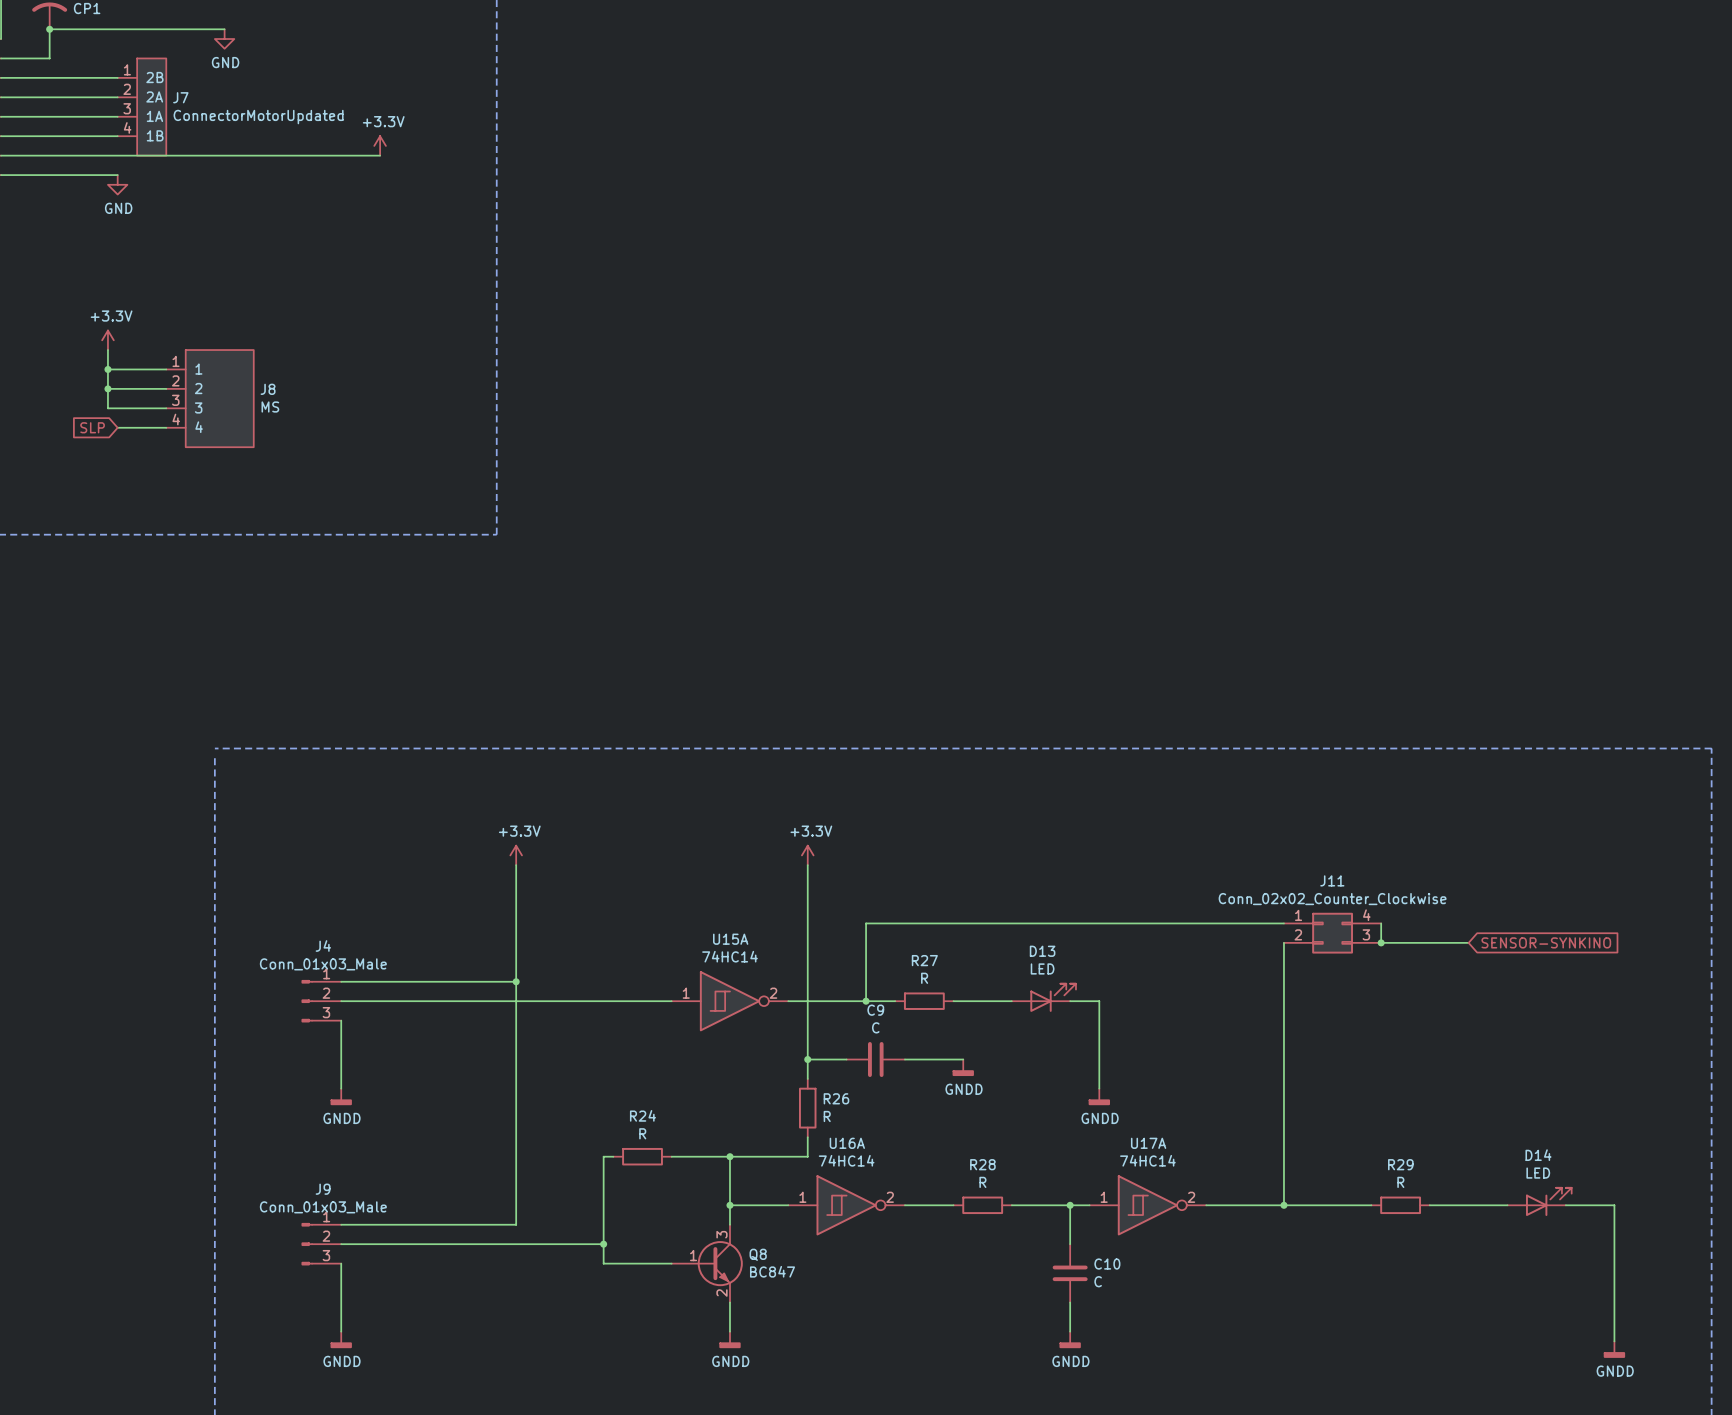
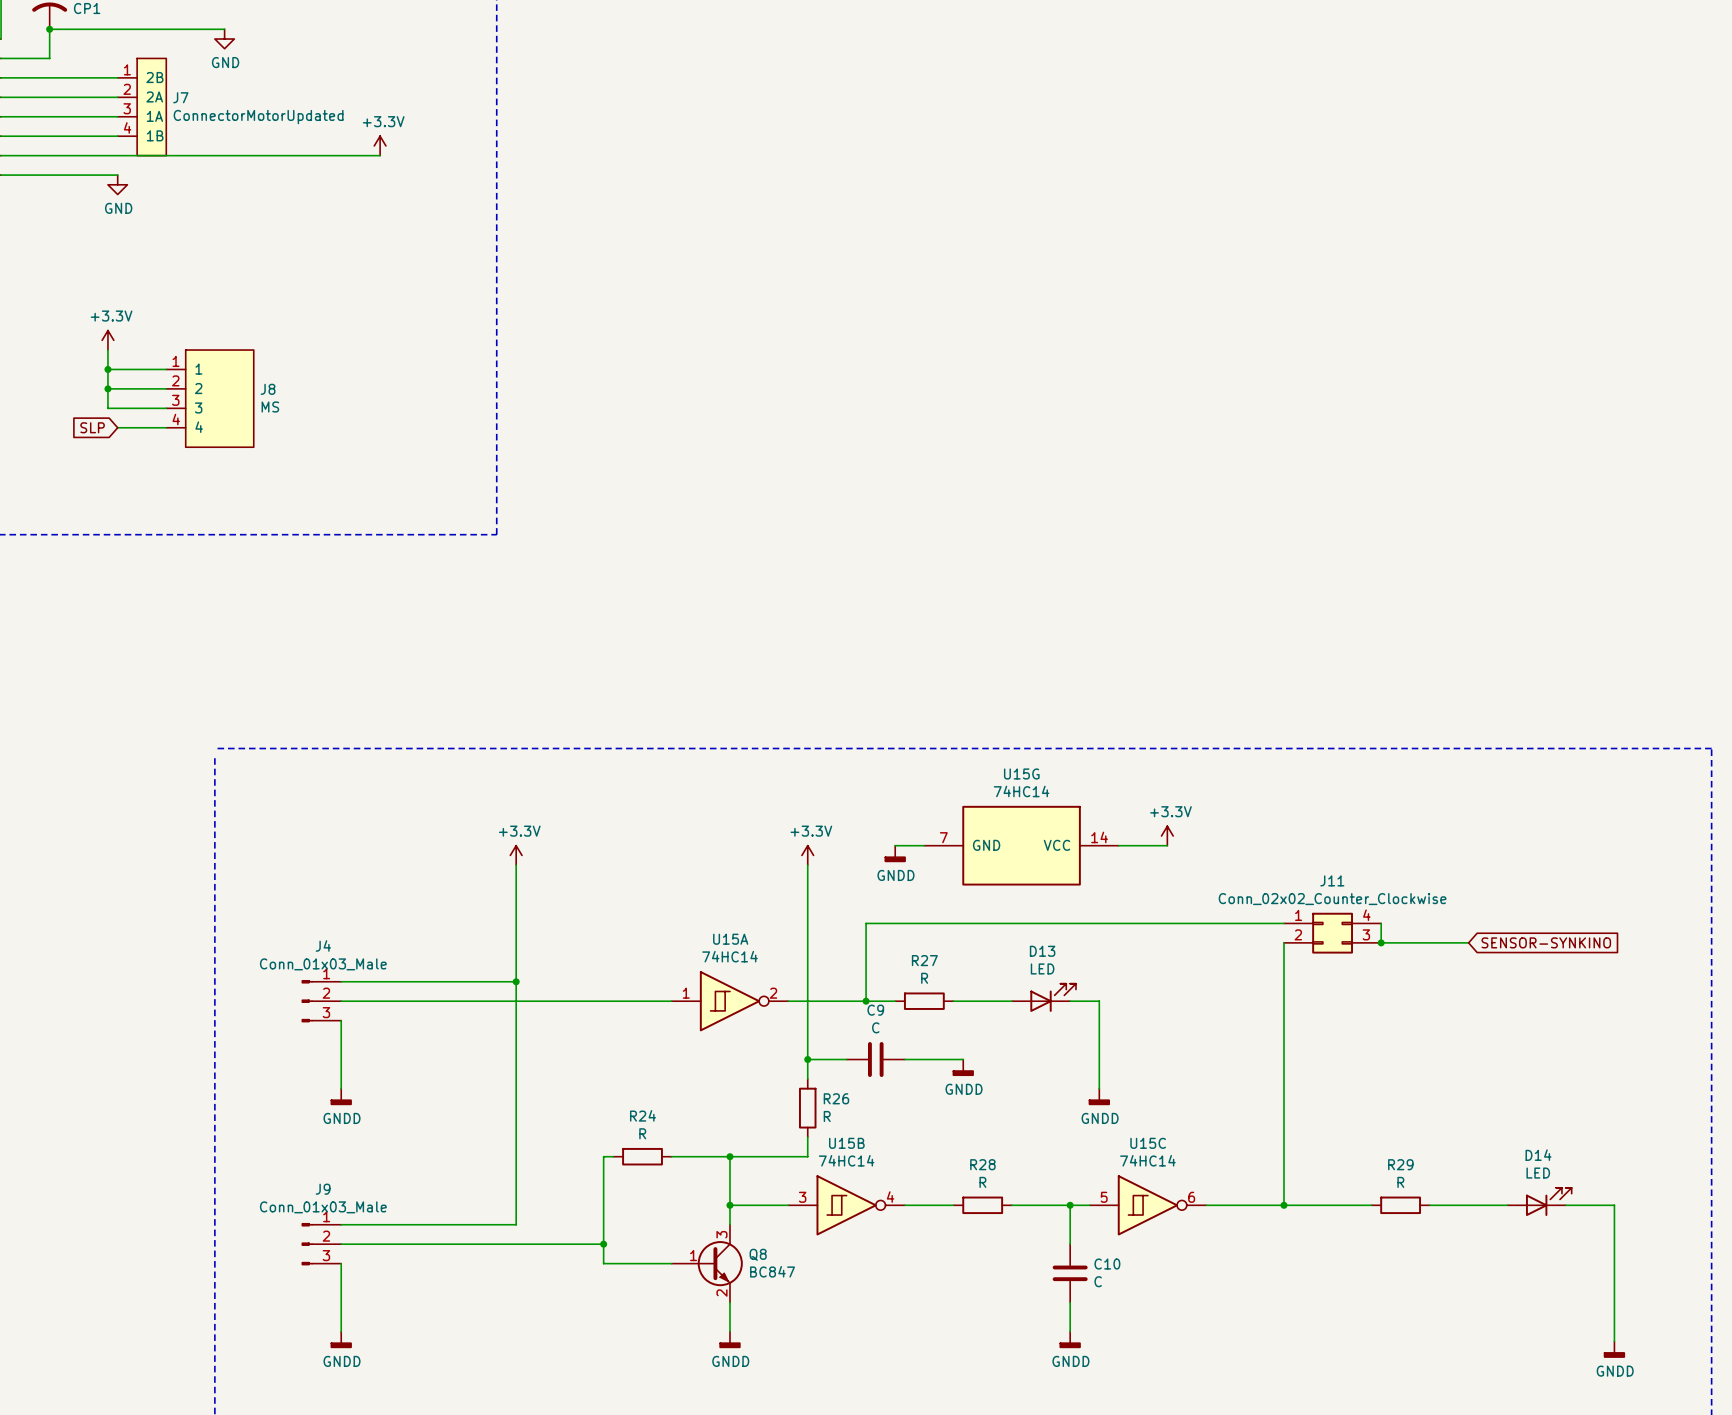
power symbol: none -> +3.3V (1167, 835)
wire: none -> (895, 845) (924, 845)
U15G: none -> 74HC14 (1021, 845)
wire: none -> (1118, 845) (1167, 845)
power symbol: none -> GNDD (895, 853)
U16A name: U16A (847, 1143) -> U15B (846, 1143)
U17A name: U17A (1148, 1143) -> U15C (1148, 1143)
U16A pin number: 1 (802, 1197) -> 3 (802, 1197)
U16A pin number: 2 (890, 1197) -> 4 (890, 1197)
U17A pin number: 1 (1104, 1197) -> 5 (1104, 1197)
U17A pin number: 2 (1191, 1197) -> 6 (1191, 1197)

